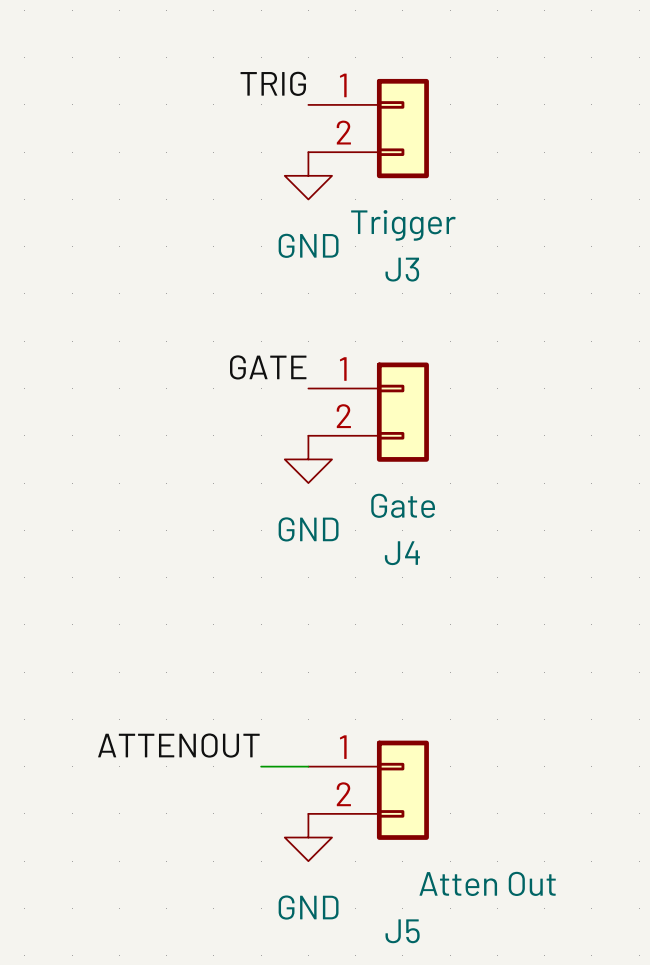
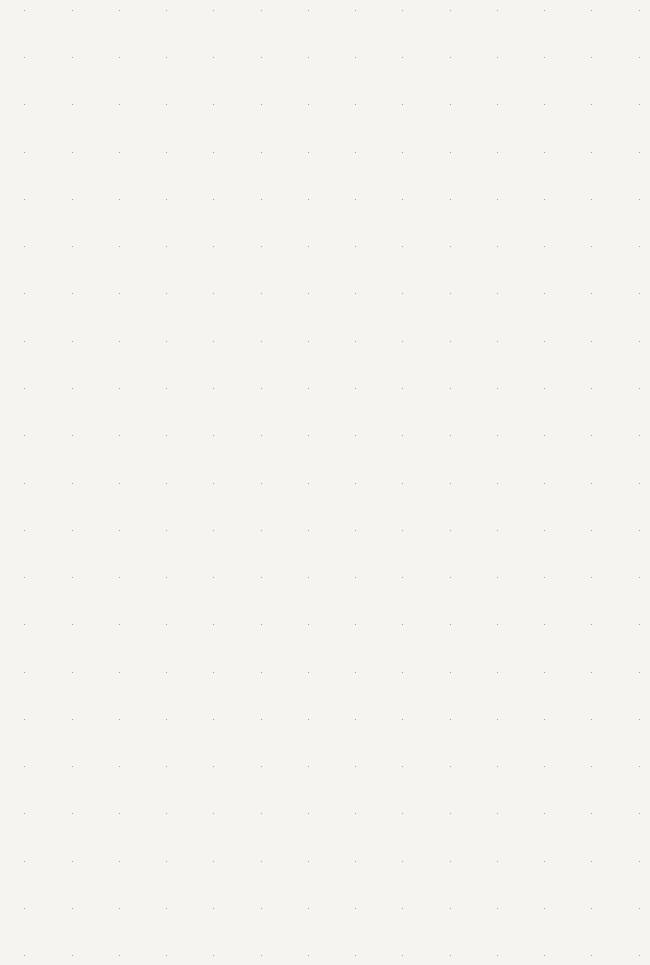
label: TRIG (273, 83) -> none
J3: Trigger (368, 128) -> none
power symbol: GND (308, 175) -> none
label: GATE (268, 367) -> none
J4: Gate (368, 412) -> none
power symbol: GND (308, 459) -> none
label: ATTENOUT (178, 745) -> none
wire: (261, 766) (308, 766) -> none
J5: Atten Out (368, 790) -> none
power symbol: GND (308, 837) -> none

